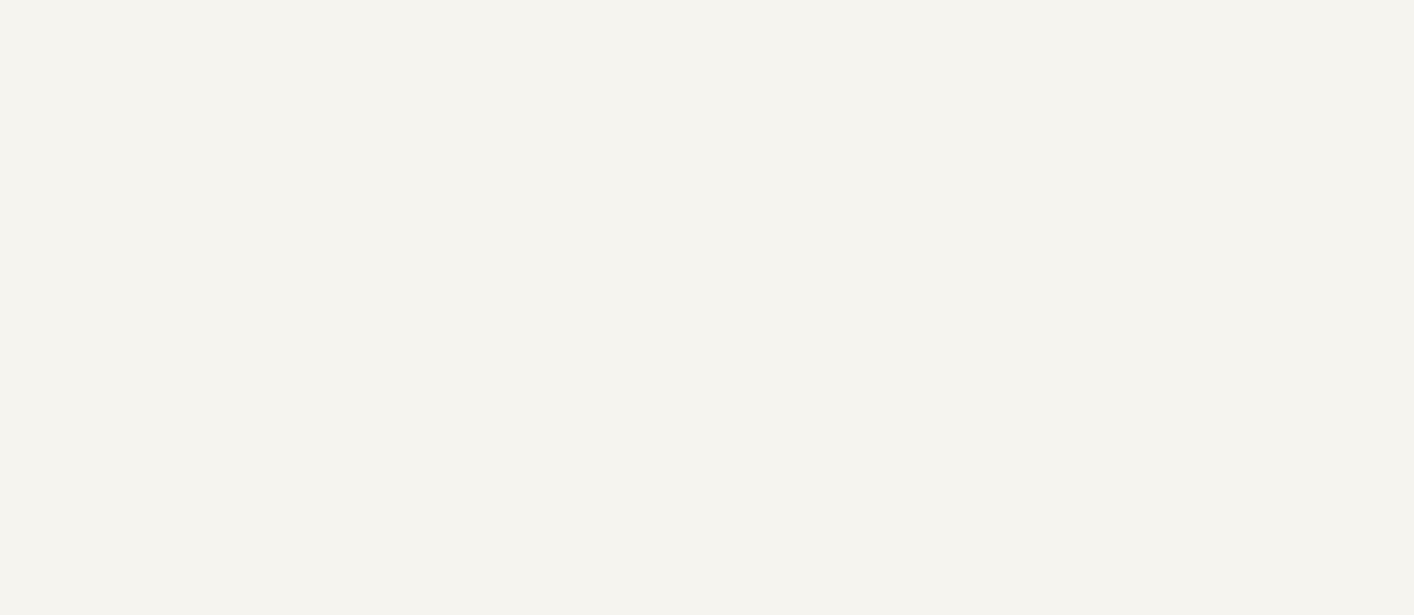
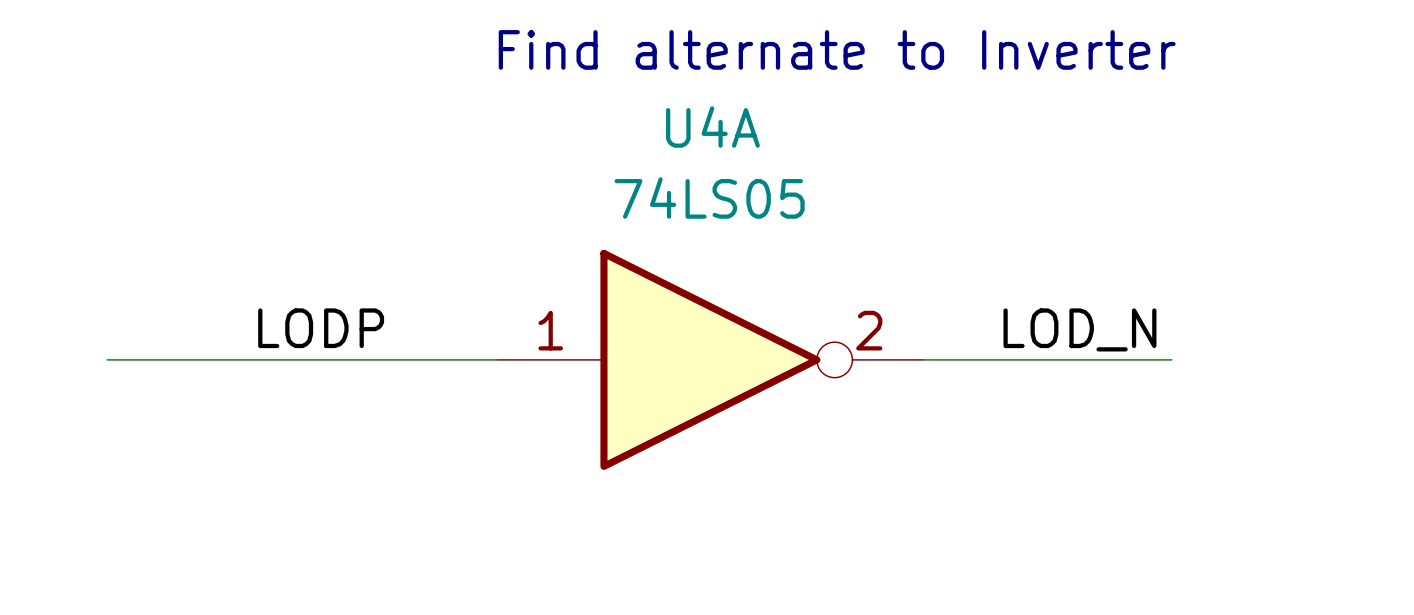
text: none -> Find alternate to Inverter (837, 49)
label: none -> LODP (321, 328)
label: none -> LOD_N (1079, 329)
wire: none -> (107, 359) (497, 359)
U4A: none -> 74LS05 (710, 359)
wire: none -> (923, 359) (1171, 359)

